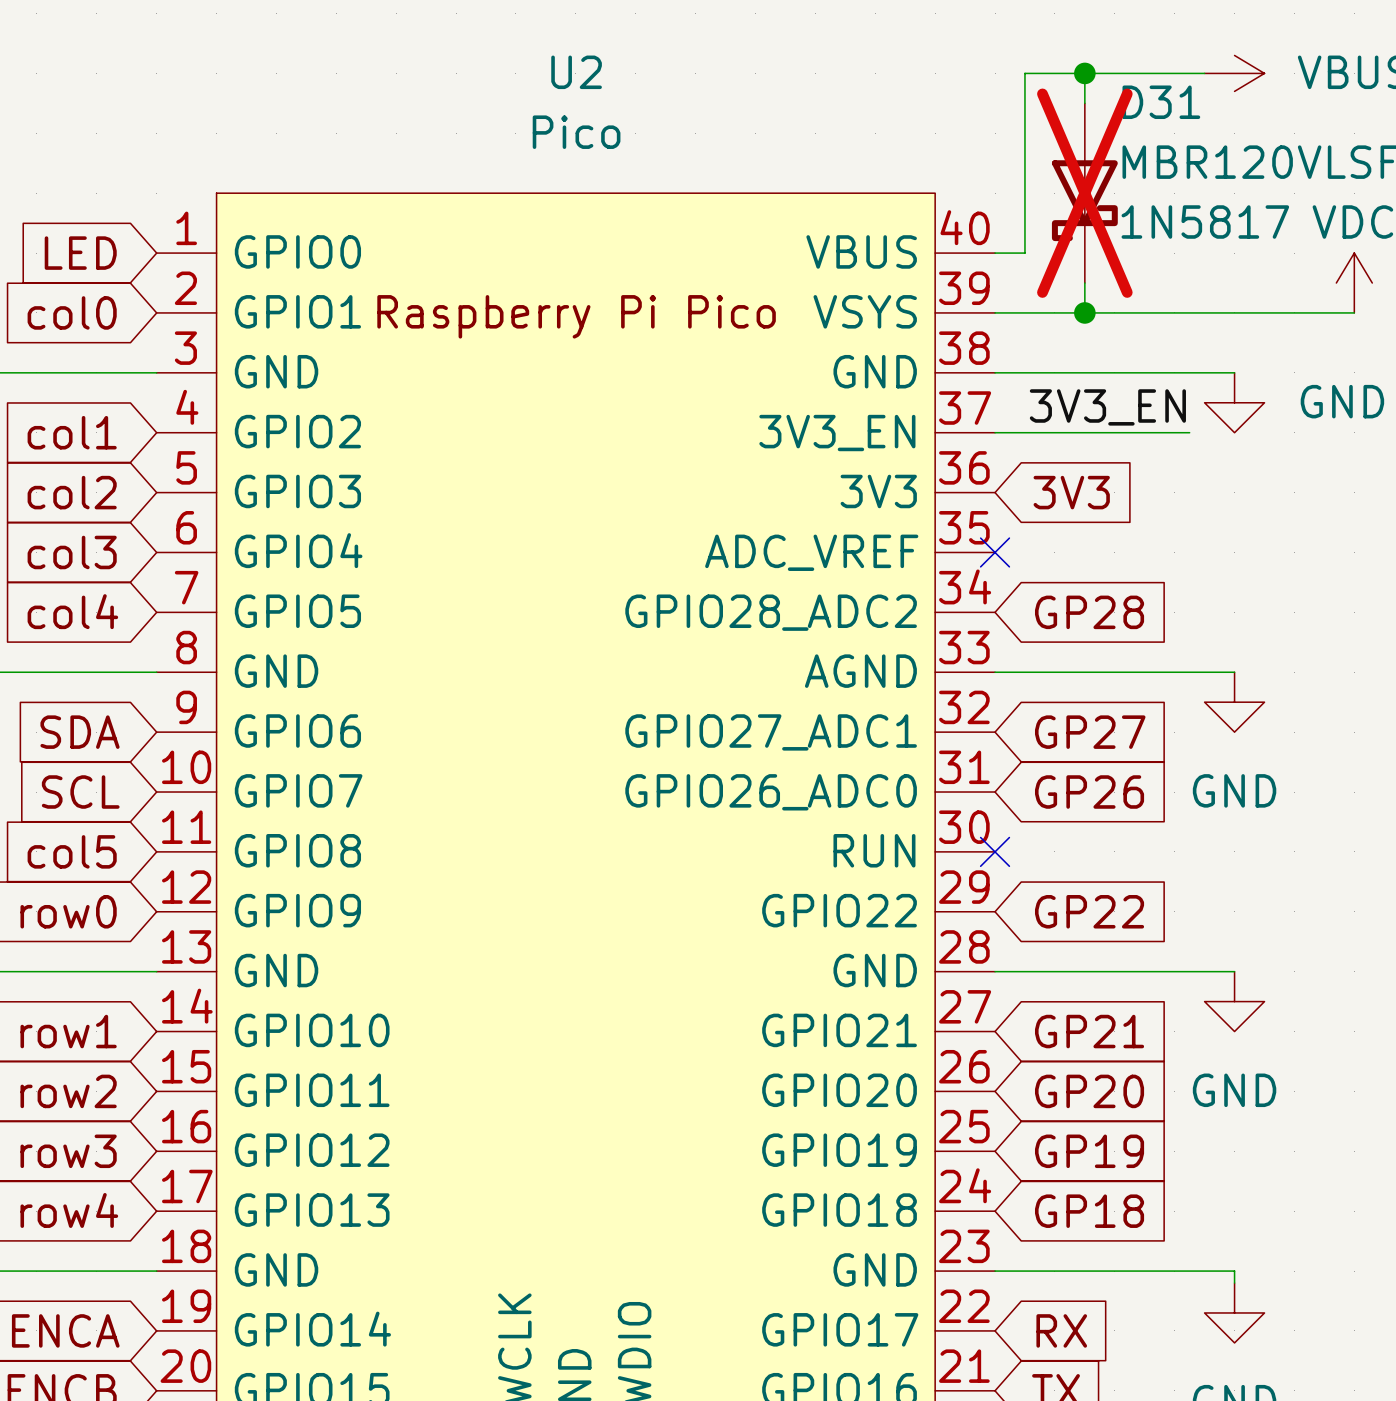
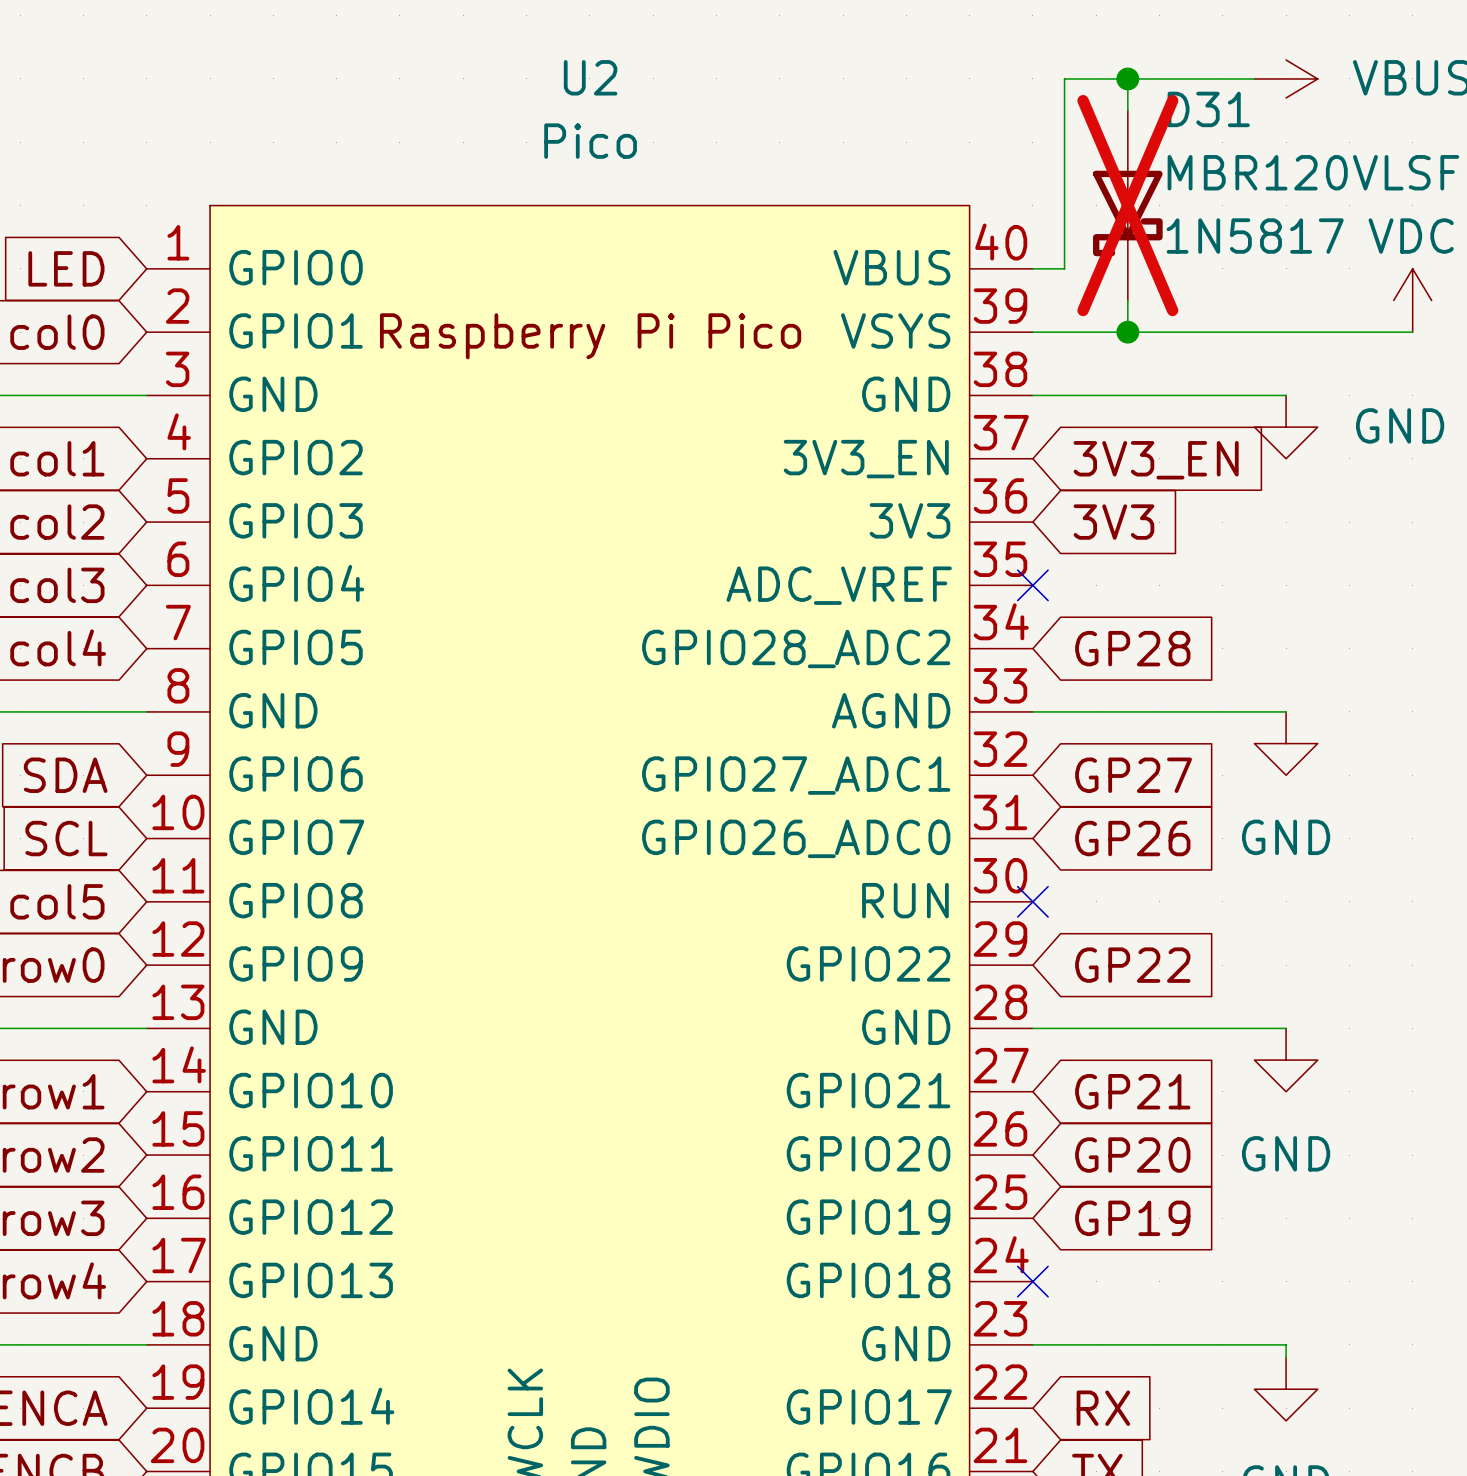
label: 3V3_EN (1107, 407) -> none
wire: (995, 432) (1189, 432) -> none
global label: none -> 3V3_EN (1156, 460)
no-connect mark: none -> (1032, 1281)
global label: GP18 (1089, 1211) -> none

